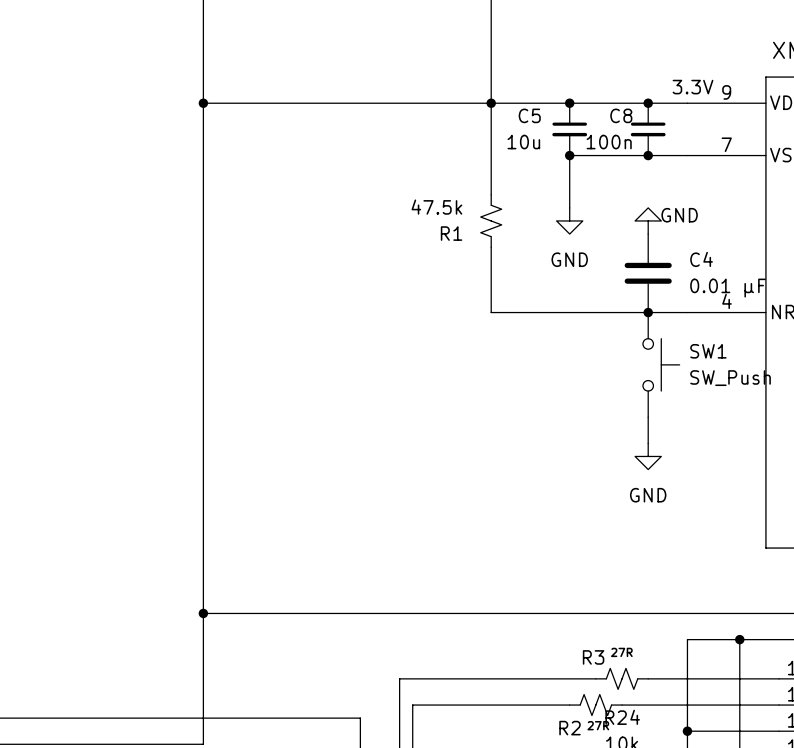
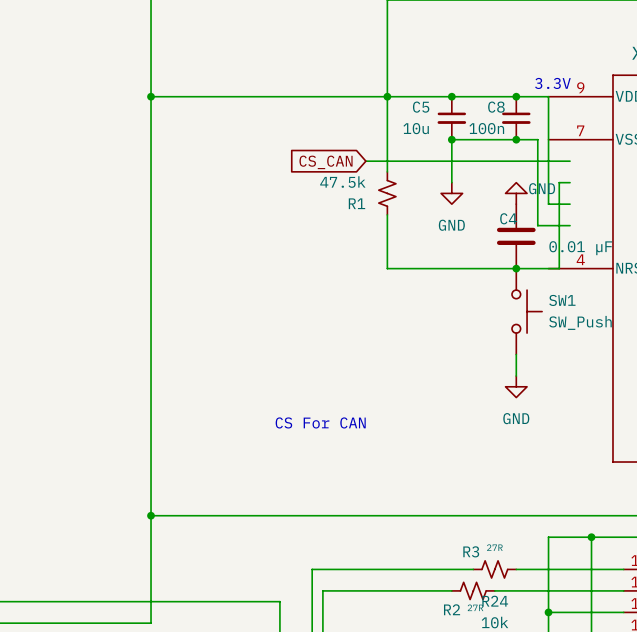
wire: none -> (548, 96) (548, 204) (570, 204)
wire: (674, 155) (687, 155) -> (537, 139) (537, 225) (570, 225)
wire: none -> (365, 161) (570, 161)
global label: none -> CS_CAN (326, 162)
wire: none -> (570, 182) (559, 182) (559, 268) (548, 268)
C4 name position: C4 (701, 259) -> C4 (508, 218)
text: none -> CS For CAN (320, 422)

